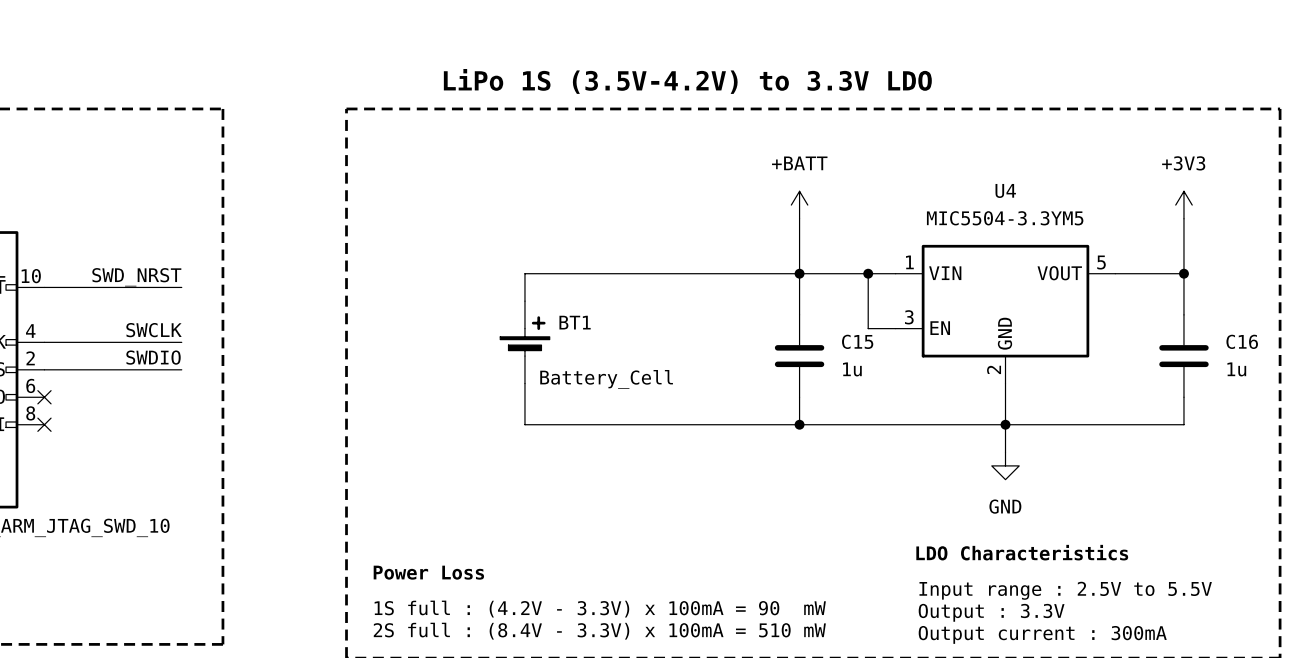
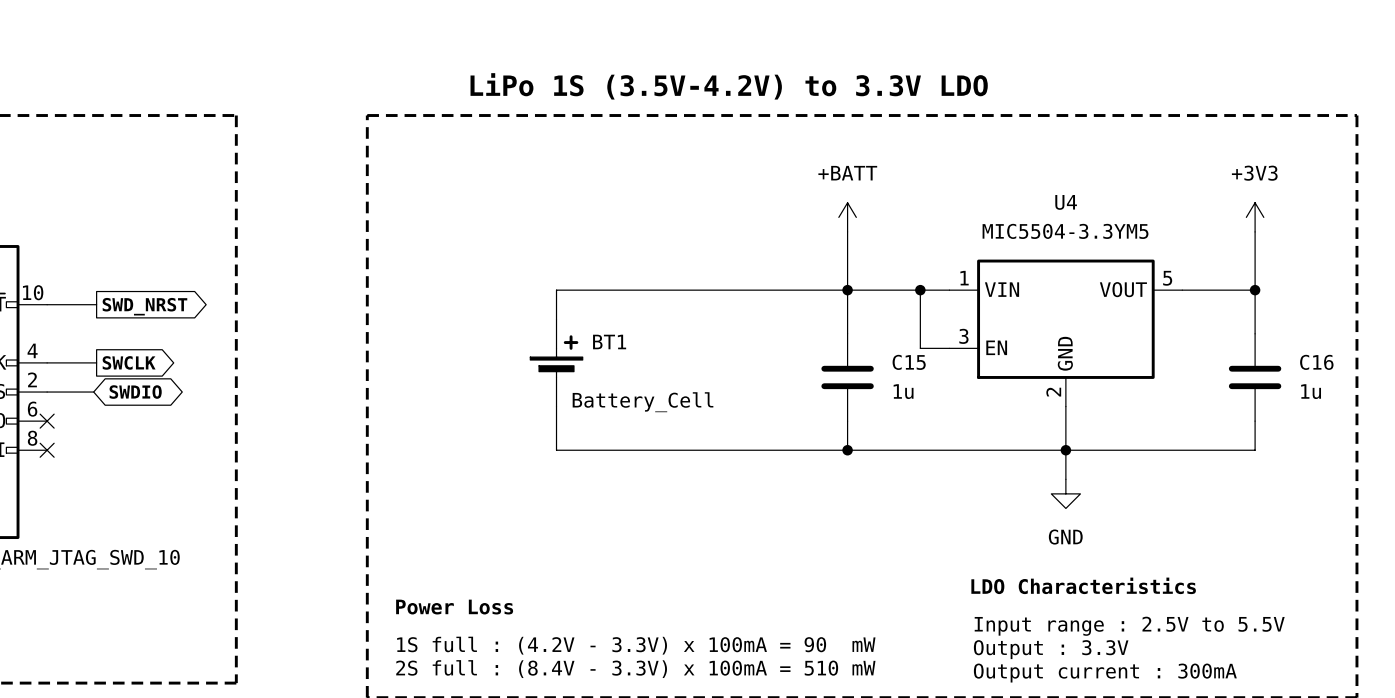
label: SWD_NRST (136, 277) -> none
wire: (91, 287) (181, 287) -> none
global label: none -> SWD_NRST (144, 306)
label: SWCLK (154, 330) -> none
wire: (91, 342) (181, 342) -> none
global label: none -> SWCLK (129, 362)
label: SWDIO (153, 357) -> none
wire: (88, 369) (181, 369) -> none
global label: none -> SWDIO (135, 392)

